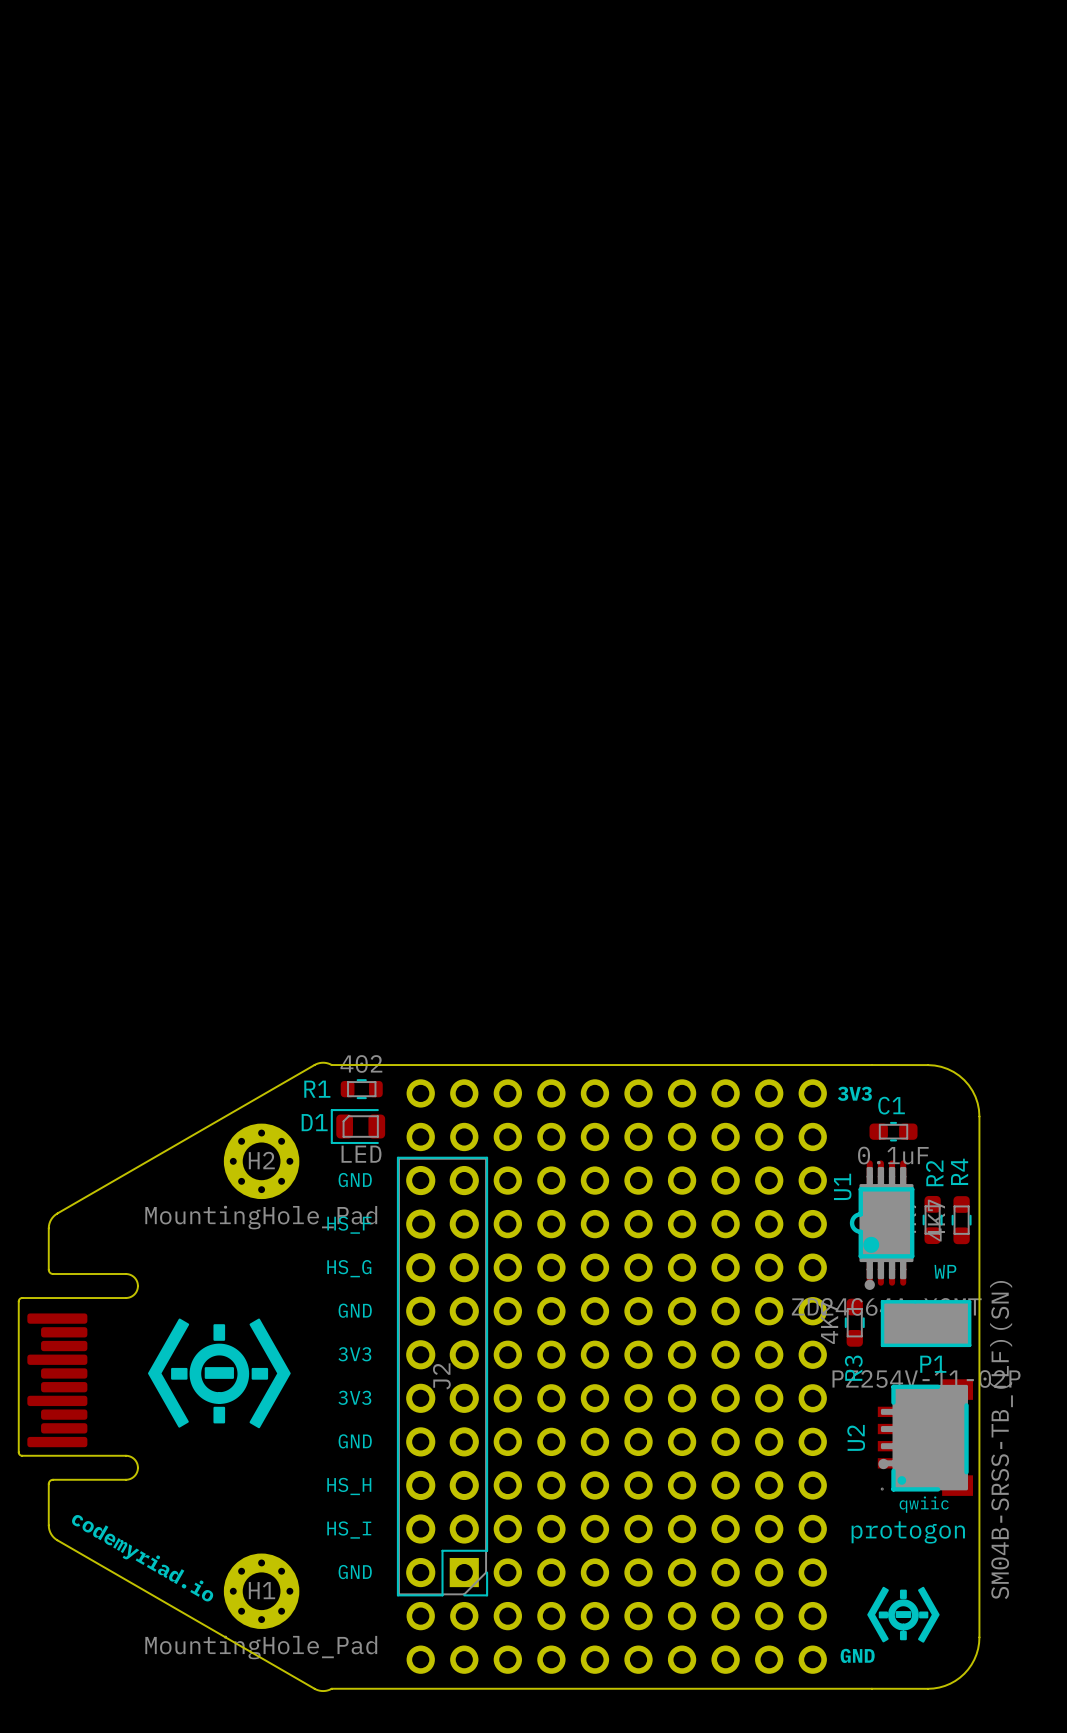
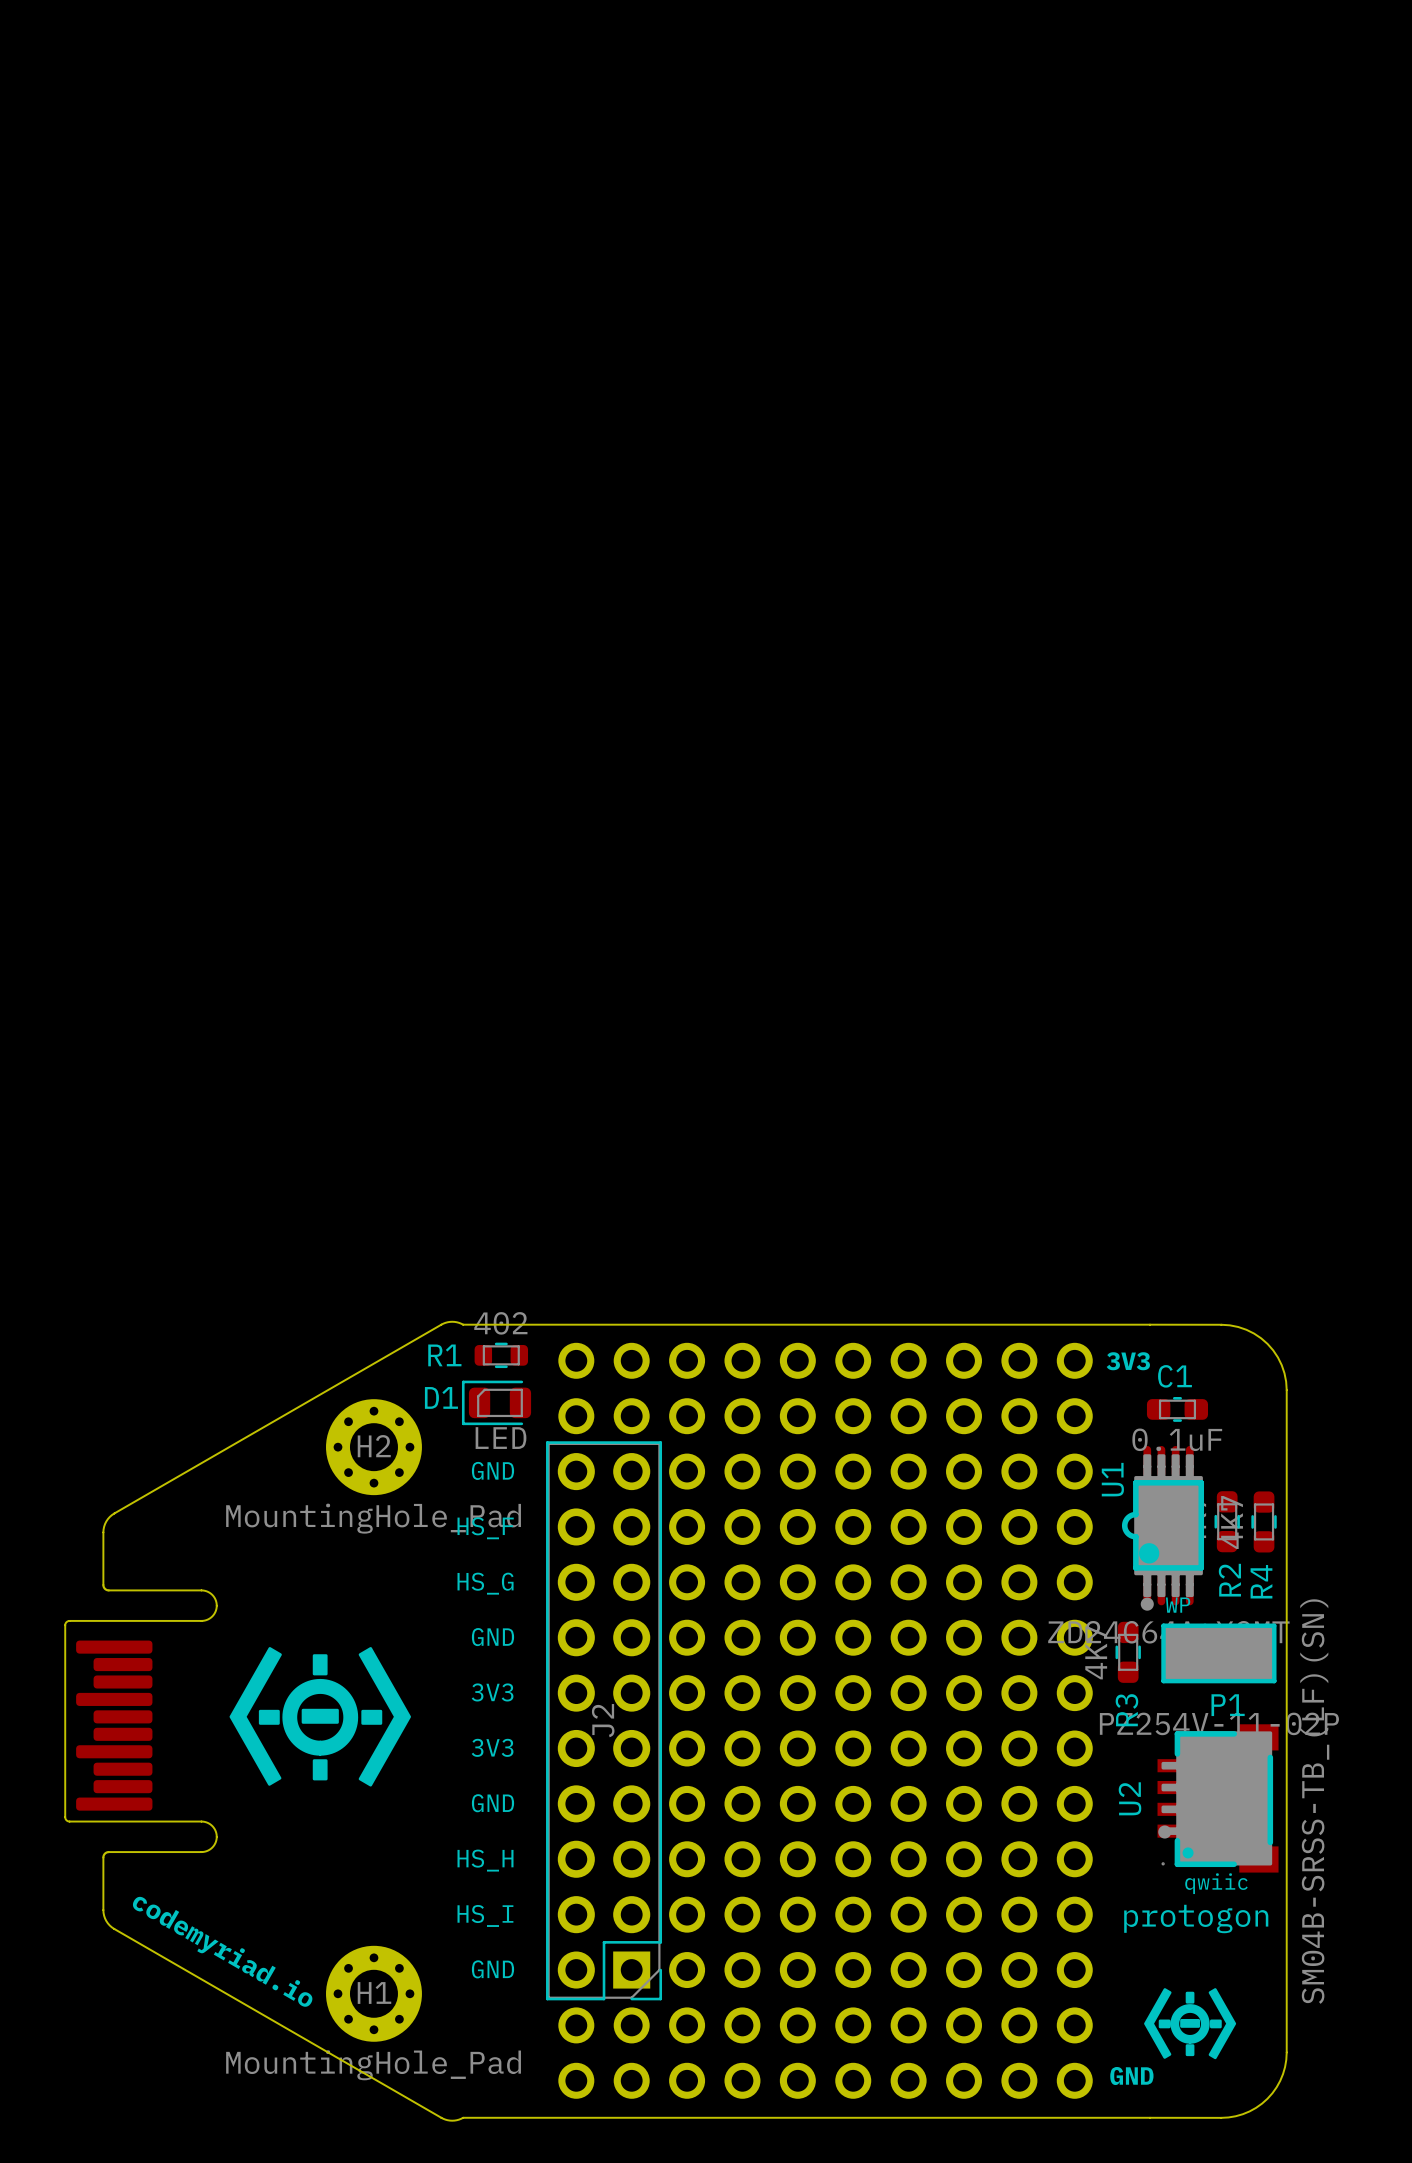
R4 name position: R4 (959, 1171) -> R4 (1261, 1581)
R2 name position: R2 (934, 1173) -> R2 (1229, 1580)
text position: WP (945, 1271) -> WP (1178, 1605)

